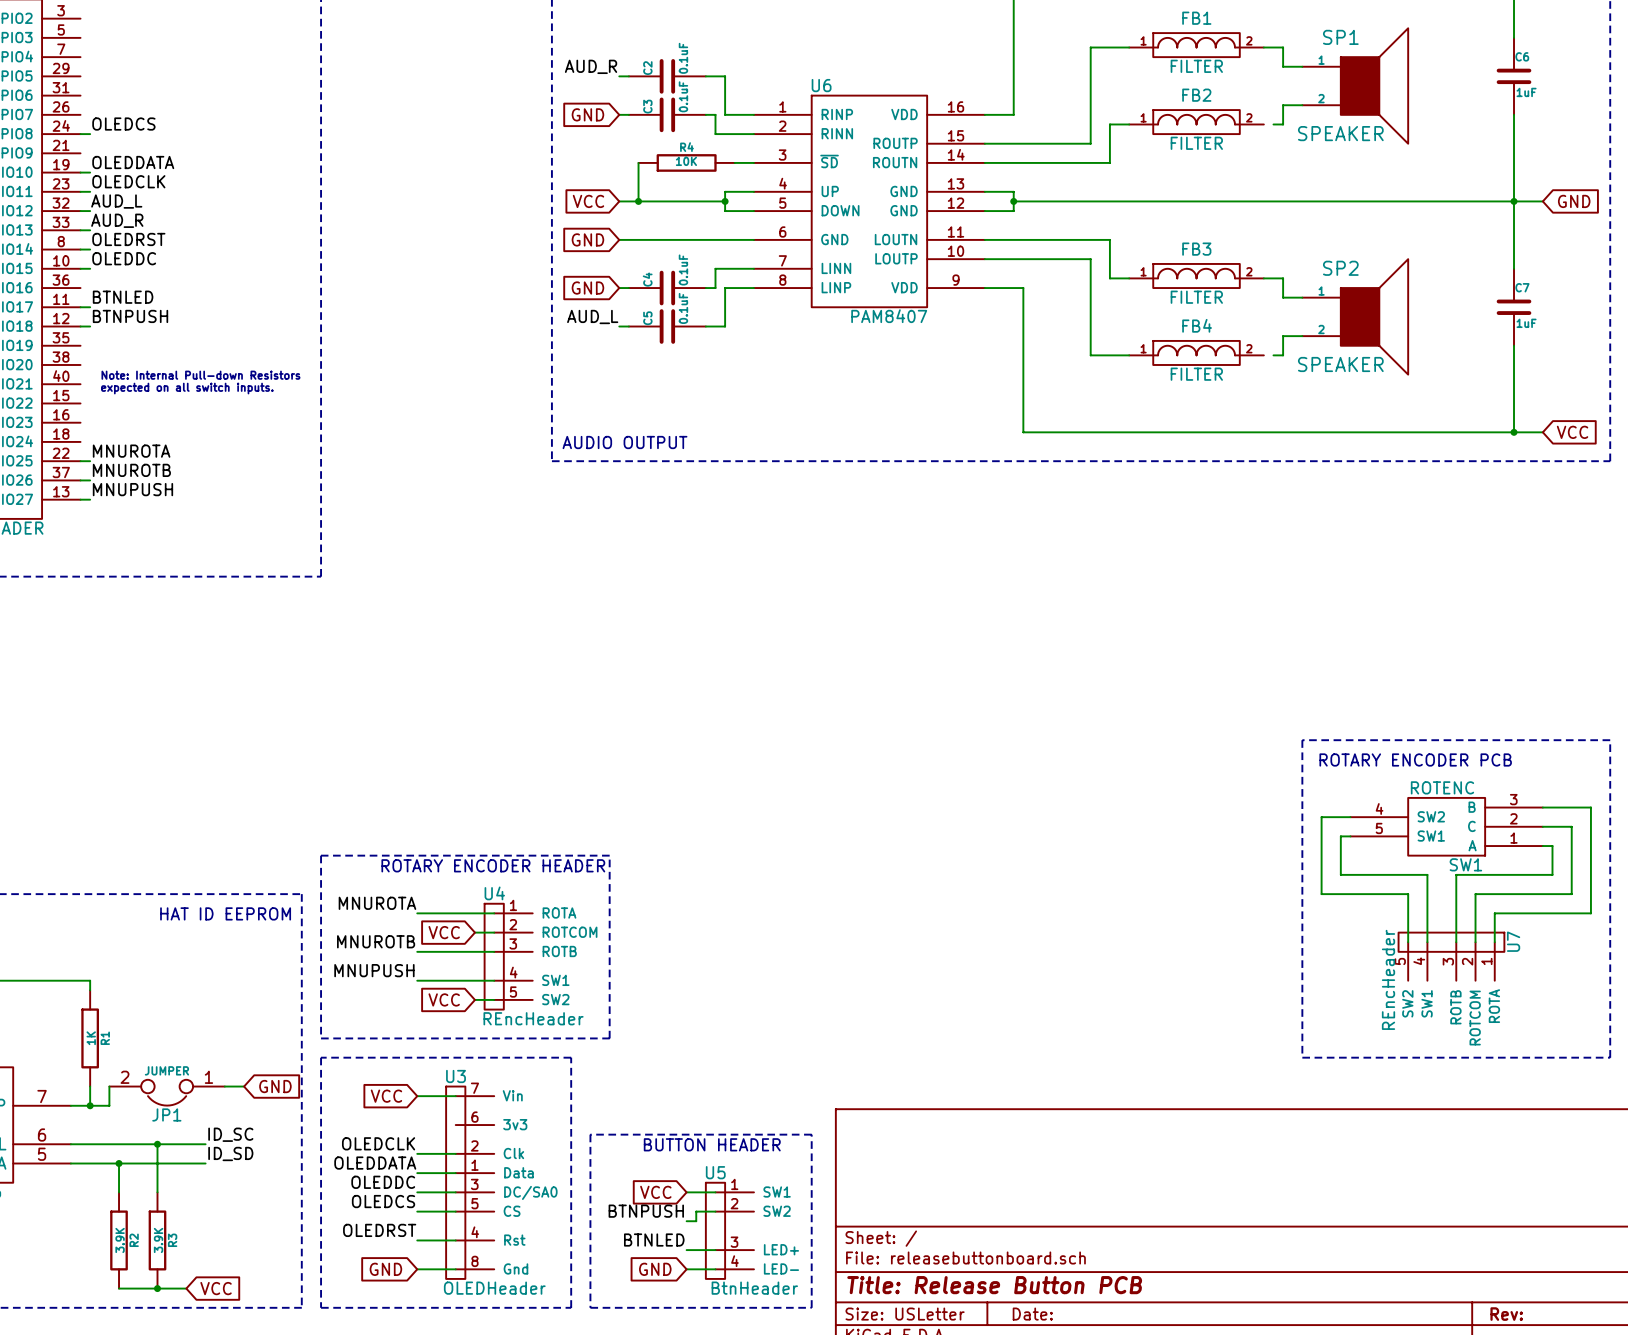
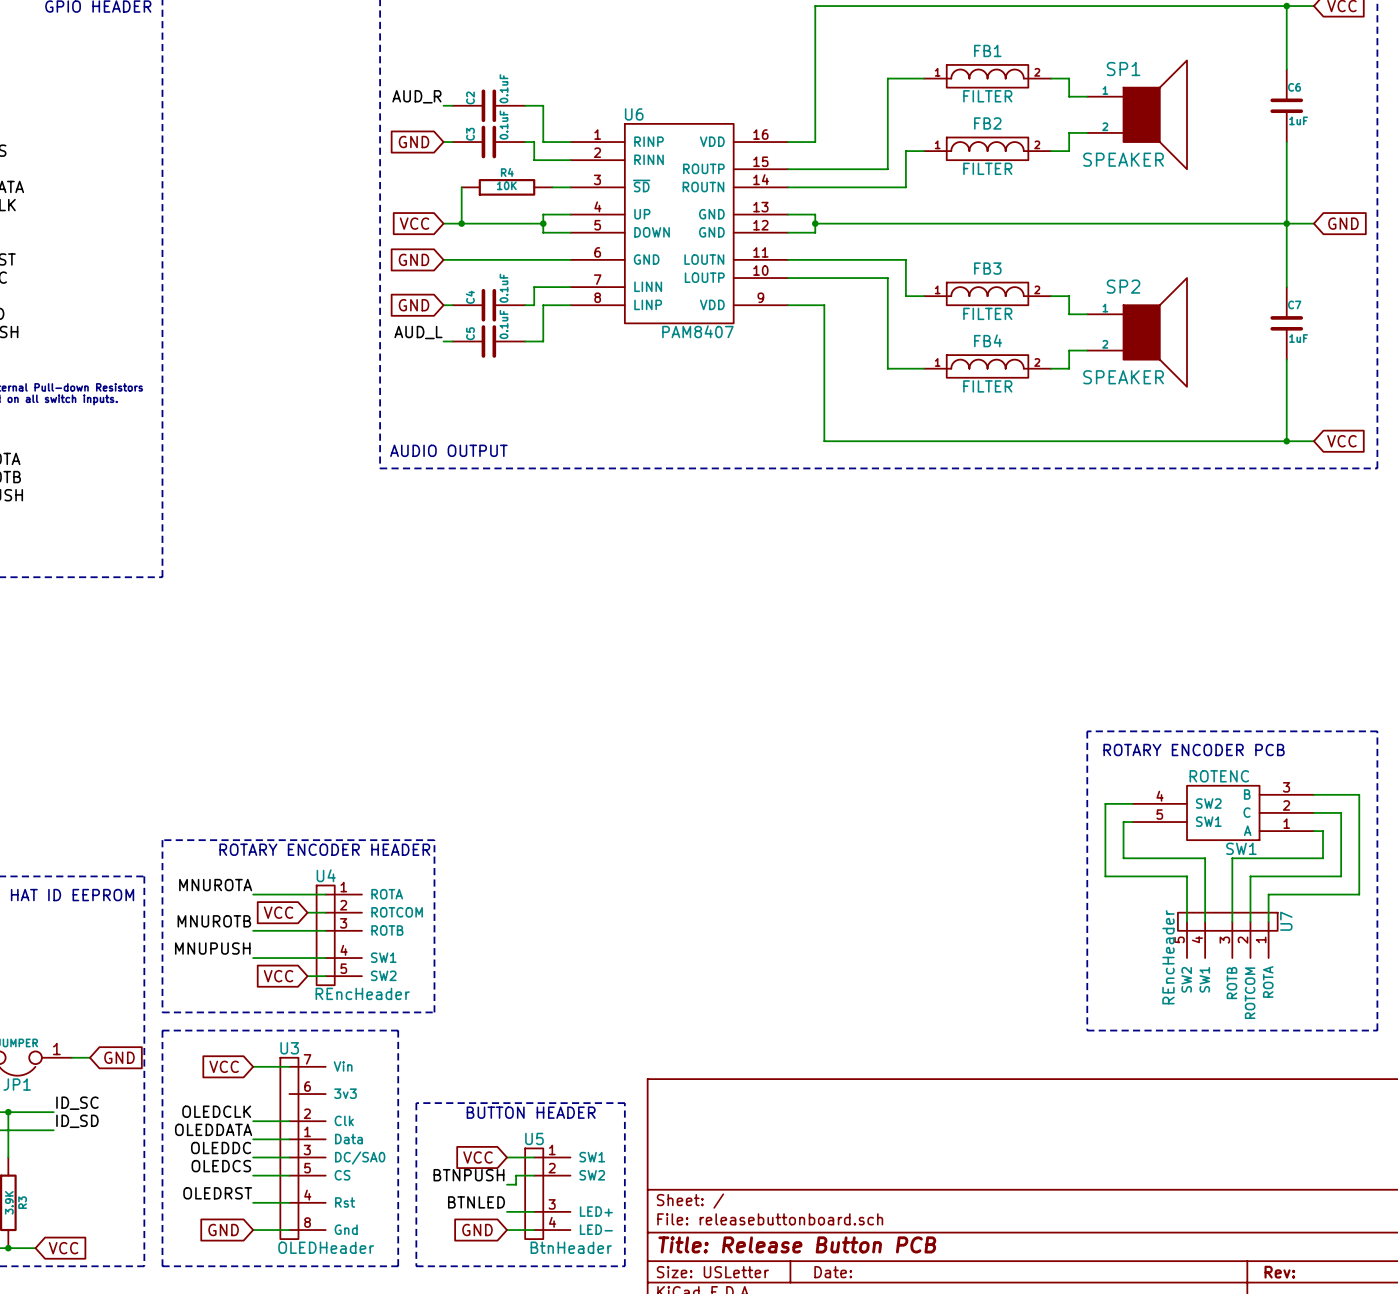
wire: none -> (1051, 151) (1060, 151)
wire: none -> (1051, 368) (1060, 368)

